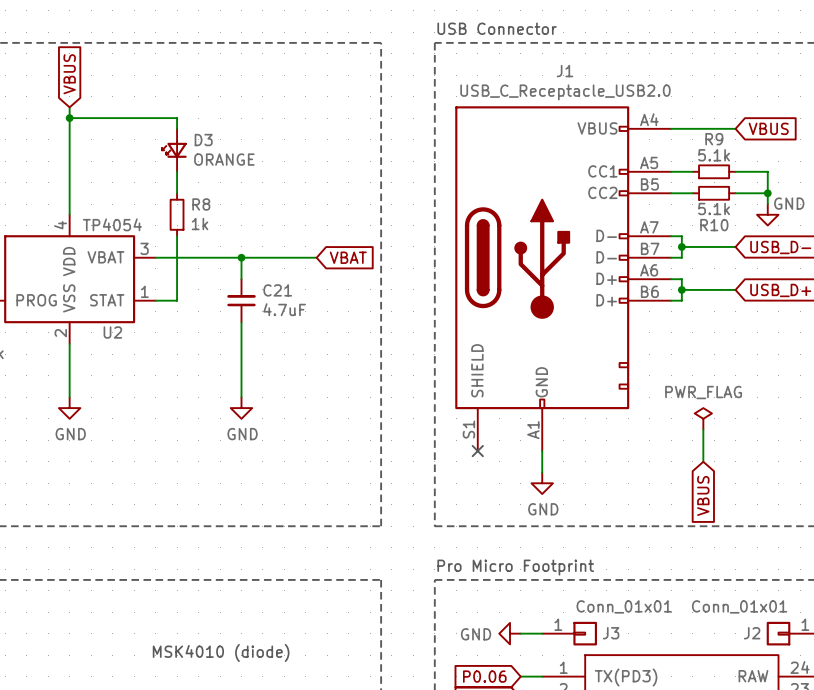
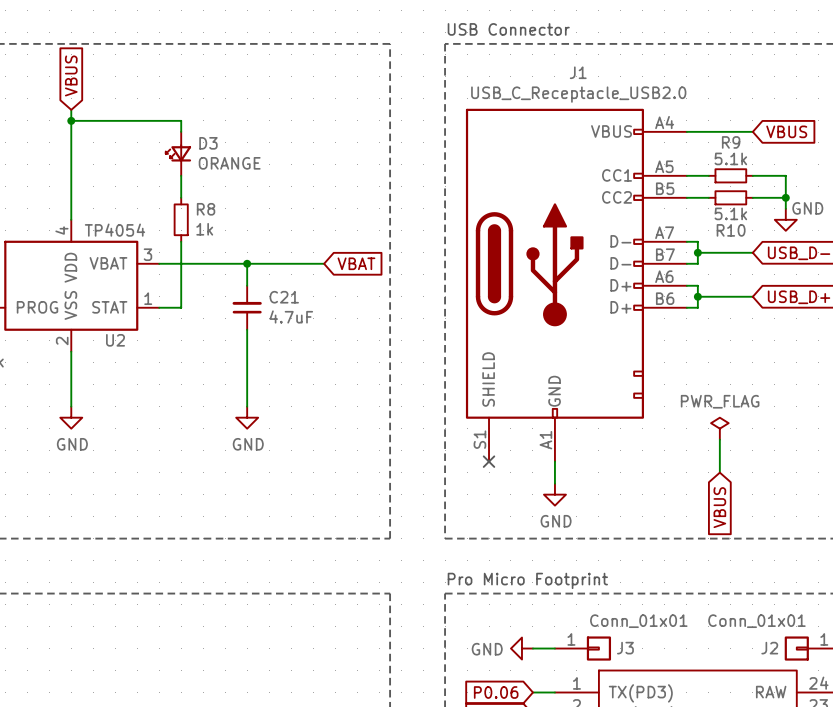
text: MSK4010 (diode) (221, 652) -> none

